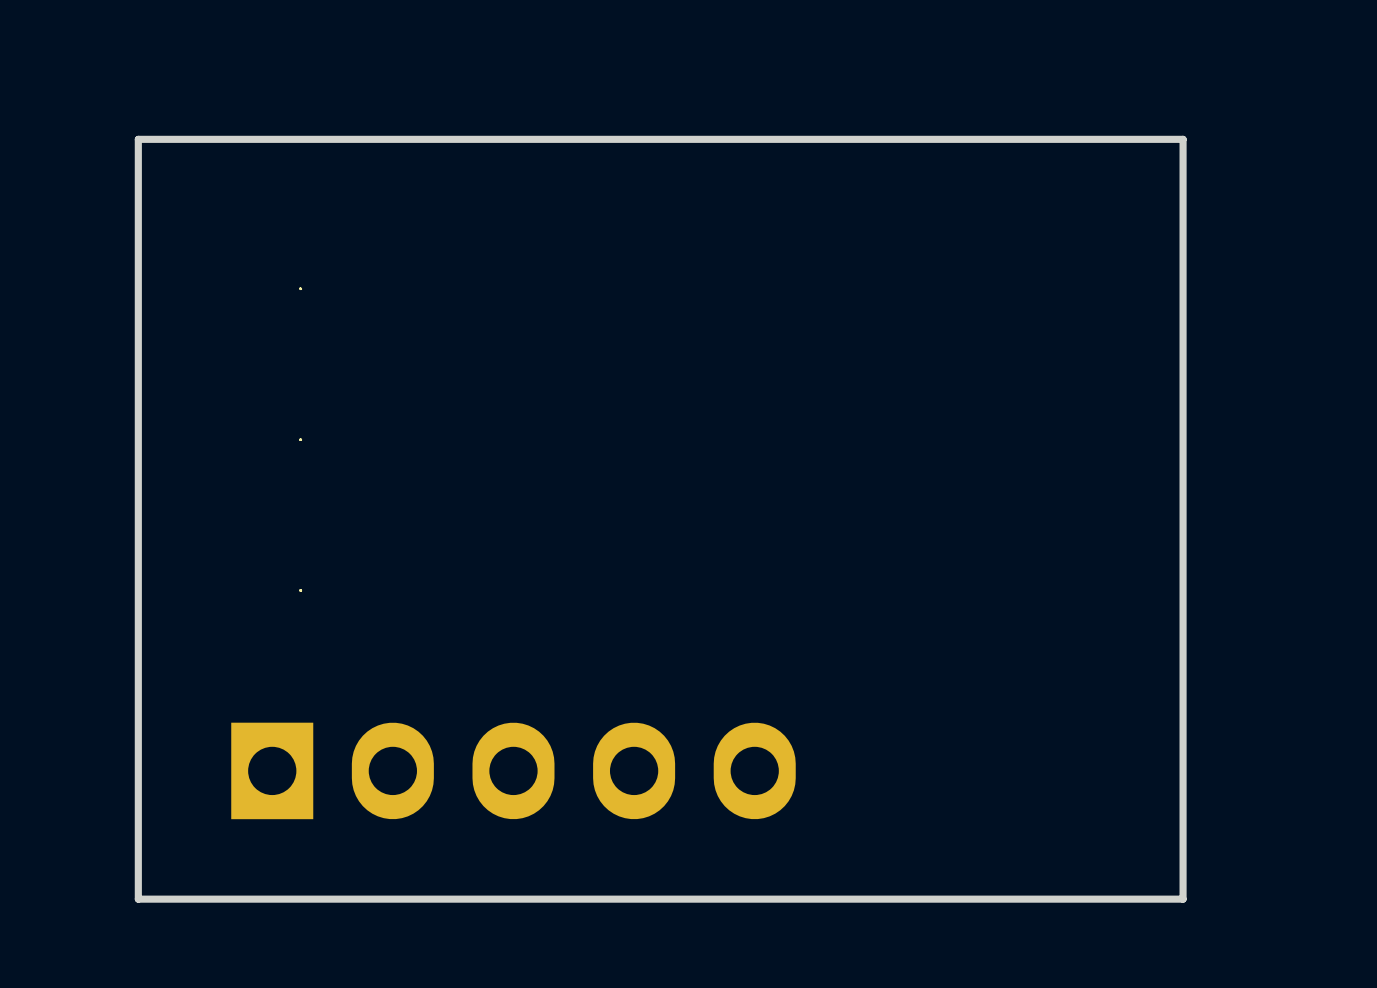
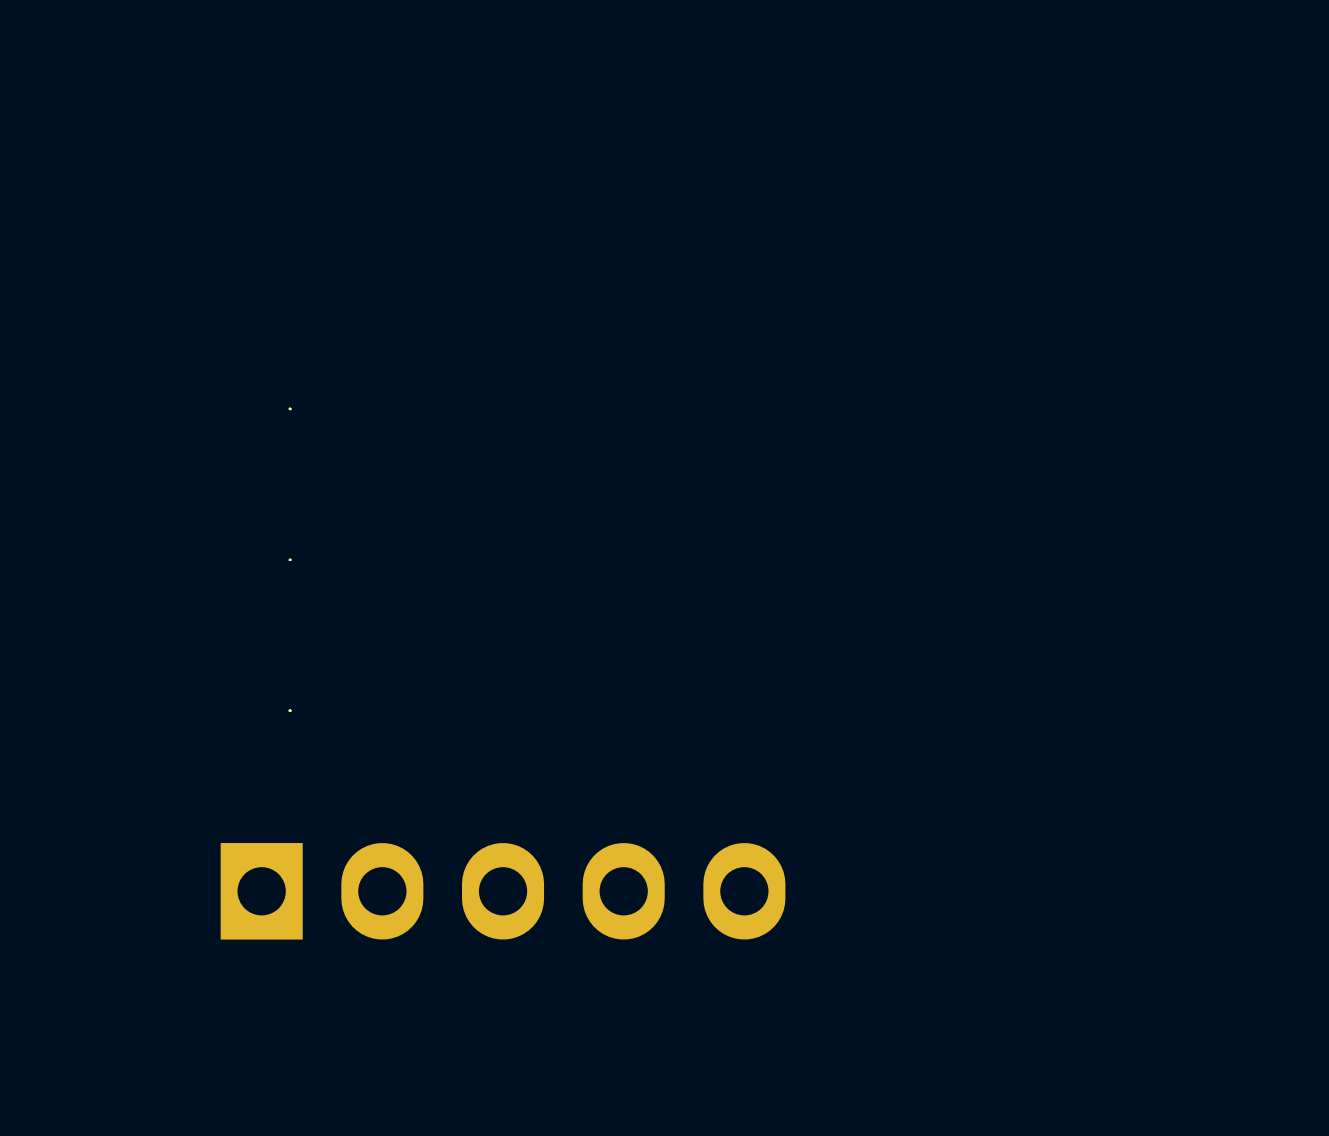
board edge: (1183, 139) (1183, 899) (138, 899) (138, 139) (1183, 139) -> none

